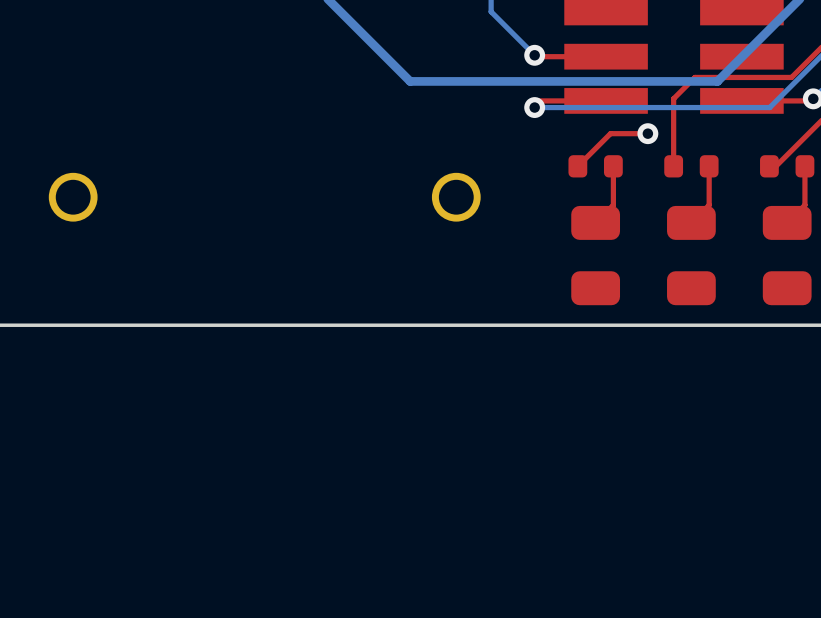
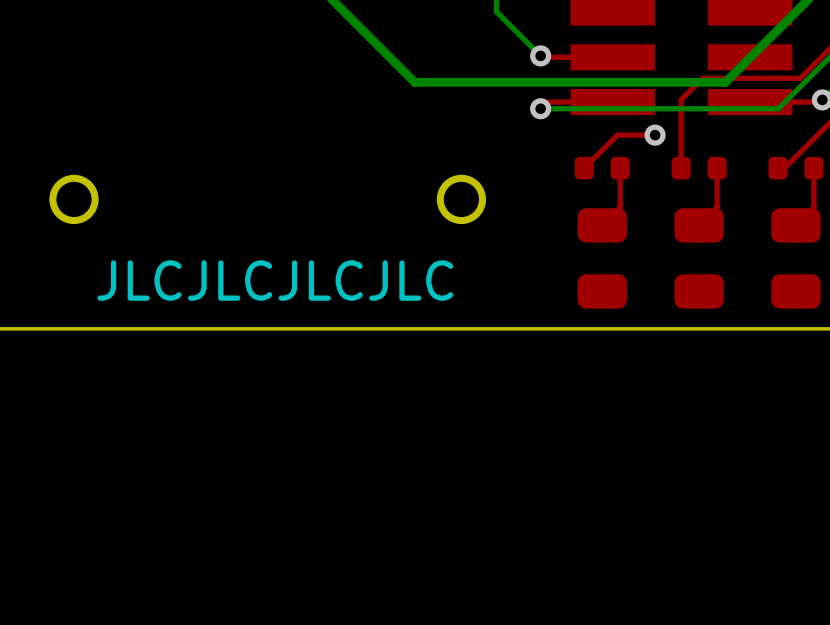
text: none -> JLCJLCJLCJLC (275, 280)

